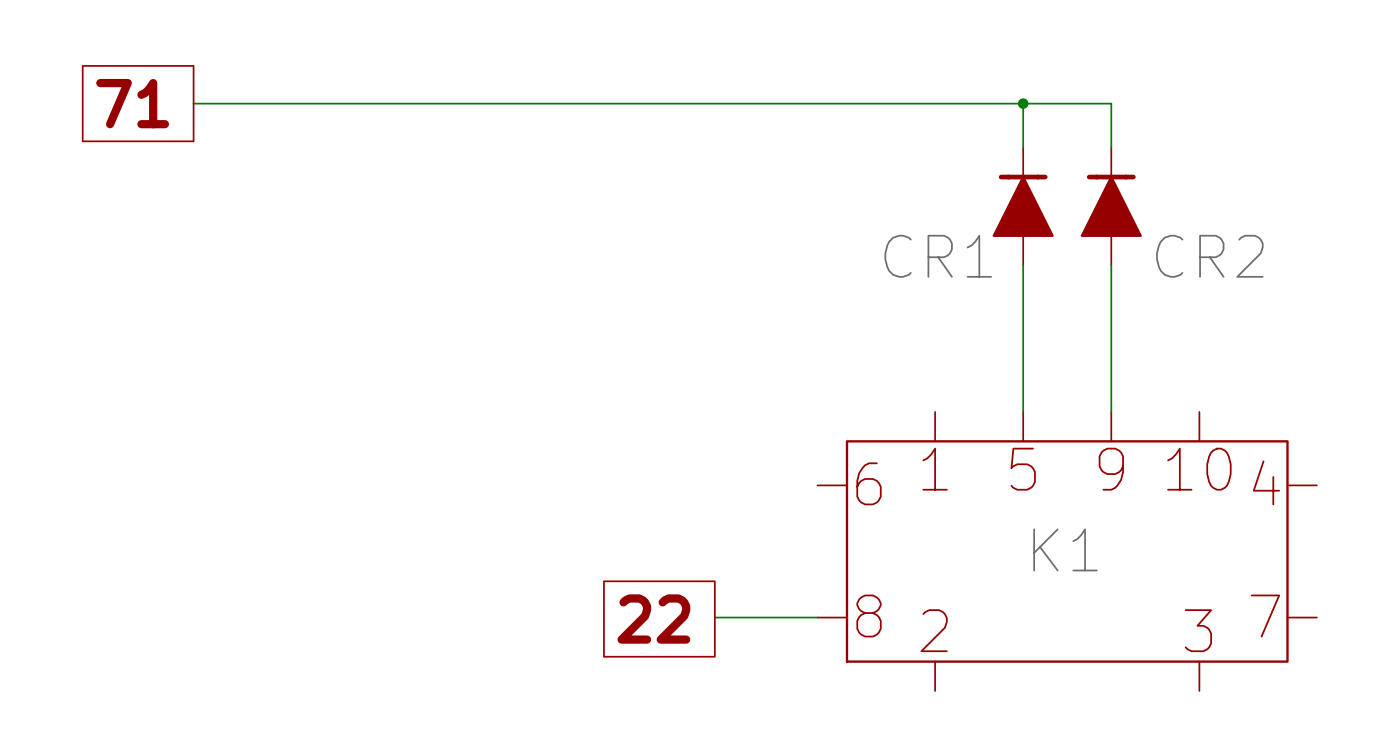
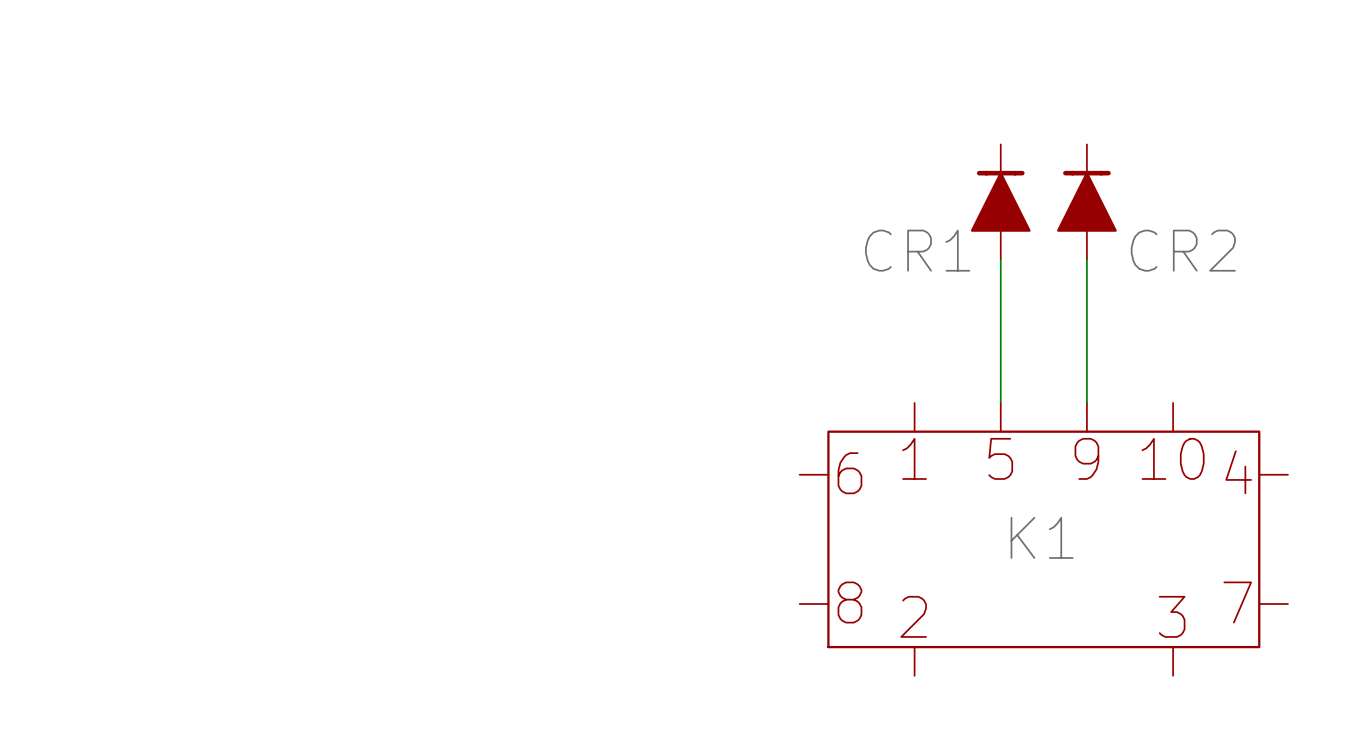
global label: 71 (132, 103) -> none
wire: (193, 103) (1111, 103) (1111, 147) -> none
wire: (1023, 103) (1023, 147) -> none
junction: (1023, 103) -> none
wire: (714, 617) (817, 617) -> none
global label: 22 (653, 619) -> none

